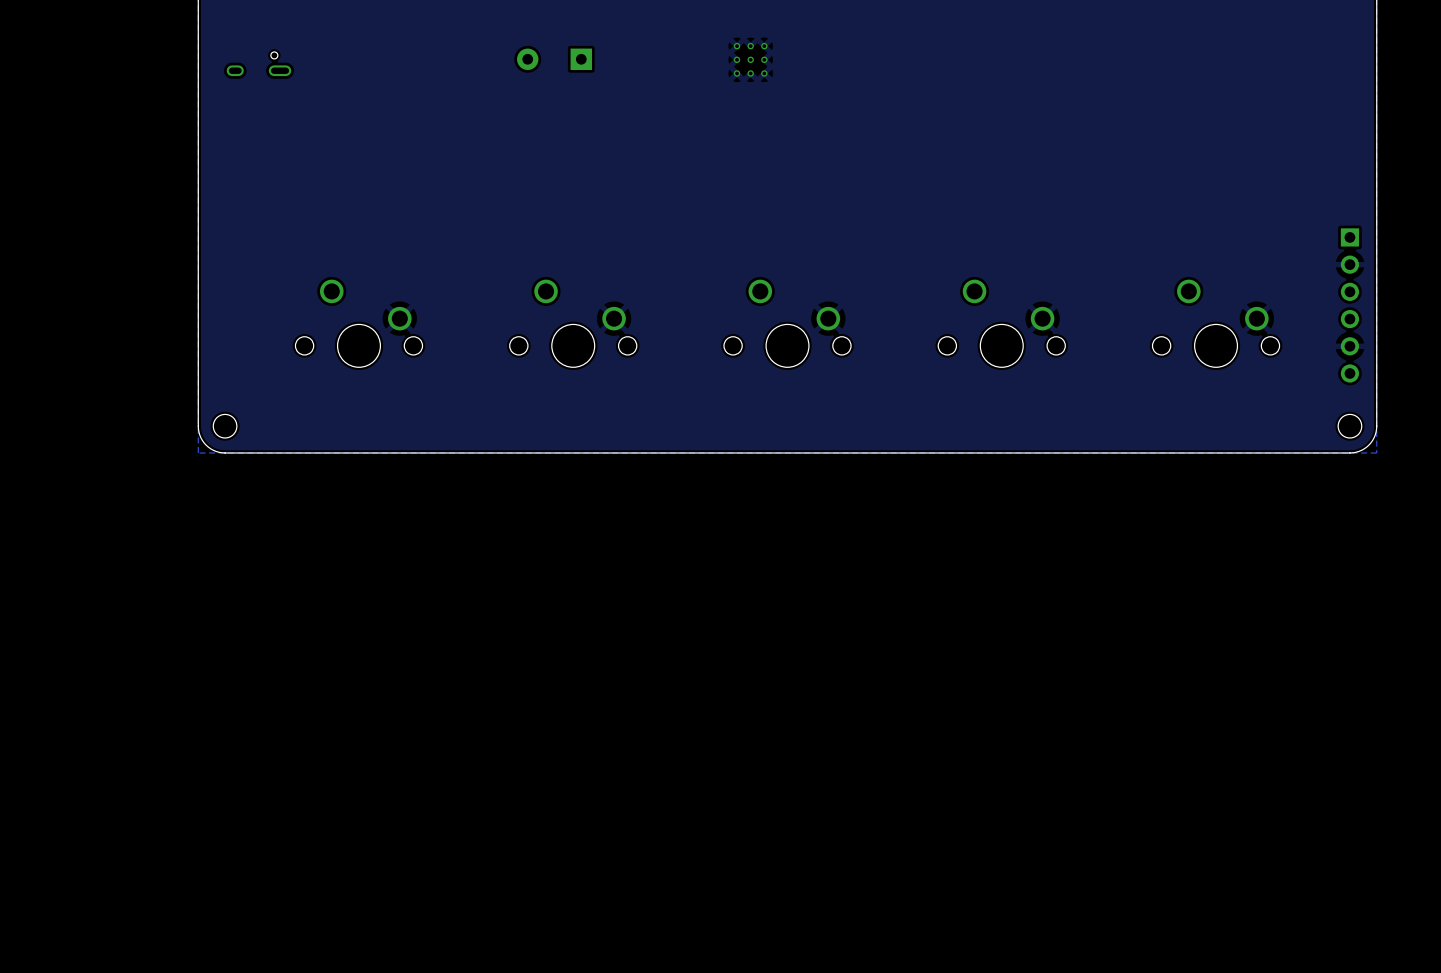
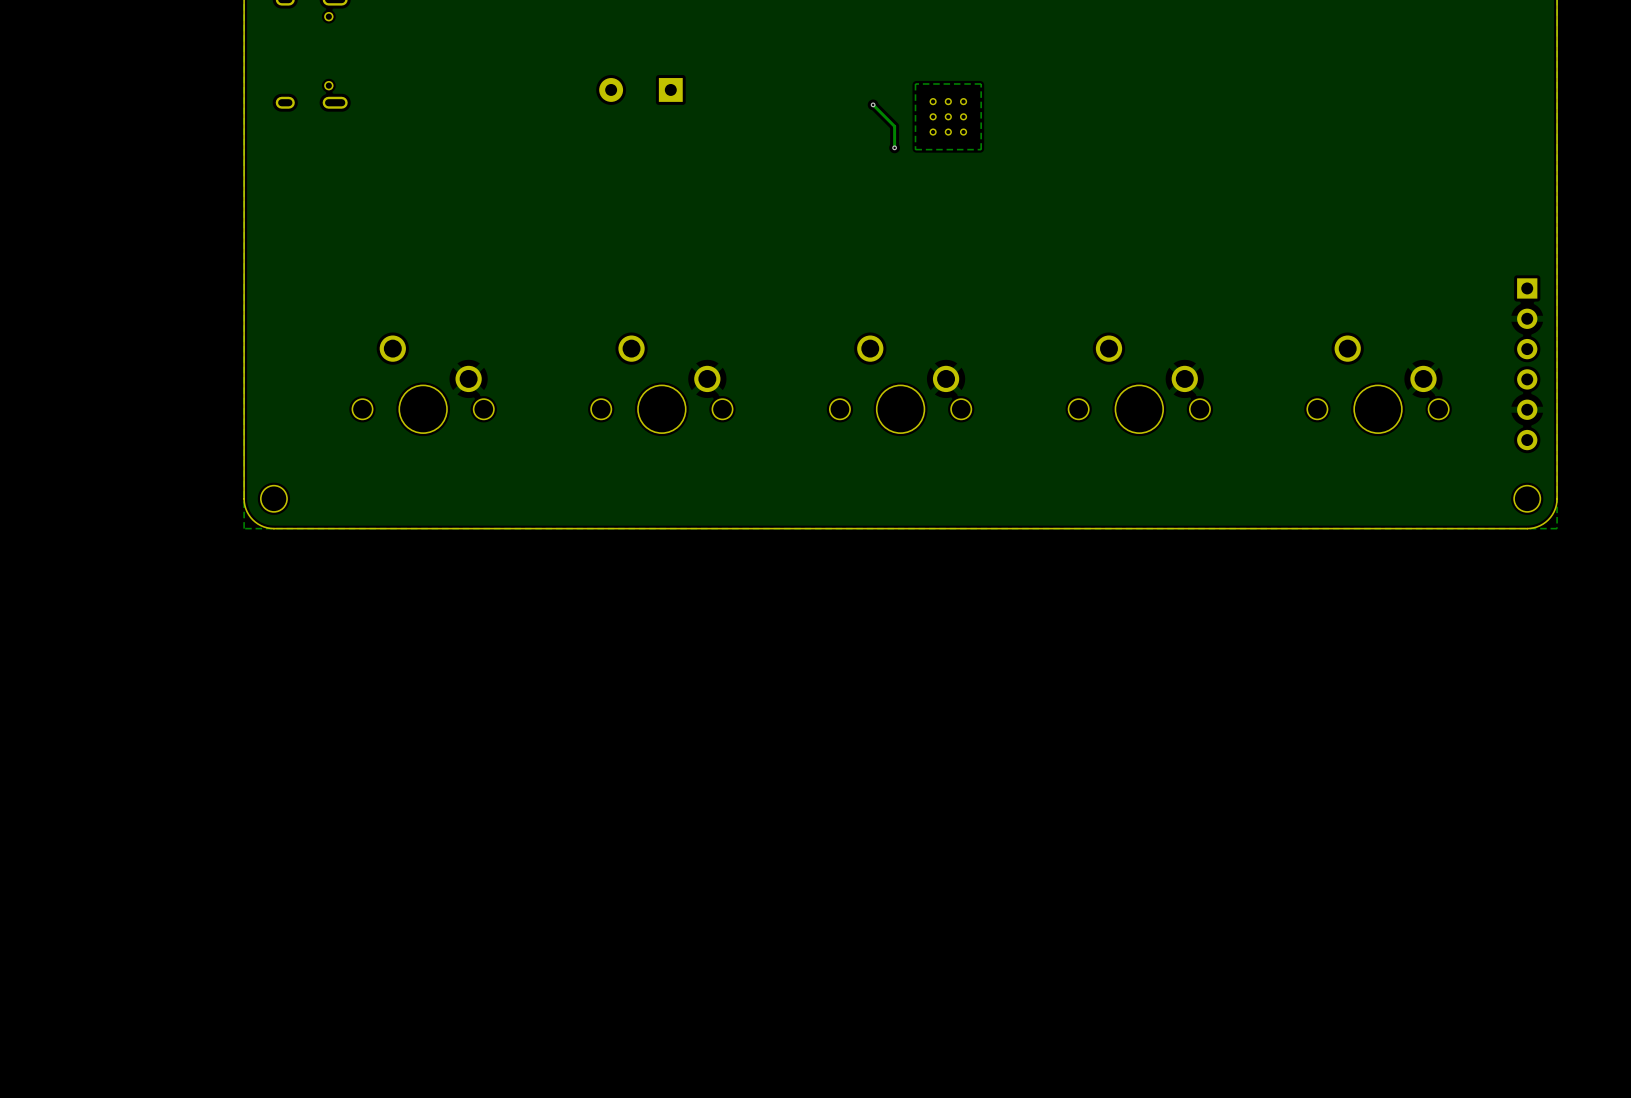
zone outline: none -> (981, 84) (915, 84) (915, 149) (981, 149) (981, 84)
part position: (750, 59) -> (948, 116)
track: none -> (873, 104) (894, 126) (894, 147)
via: none -> (873, 104)
via: none -> (894, 147)

